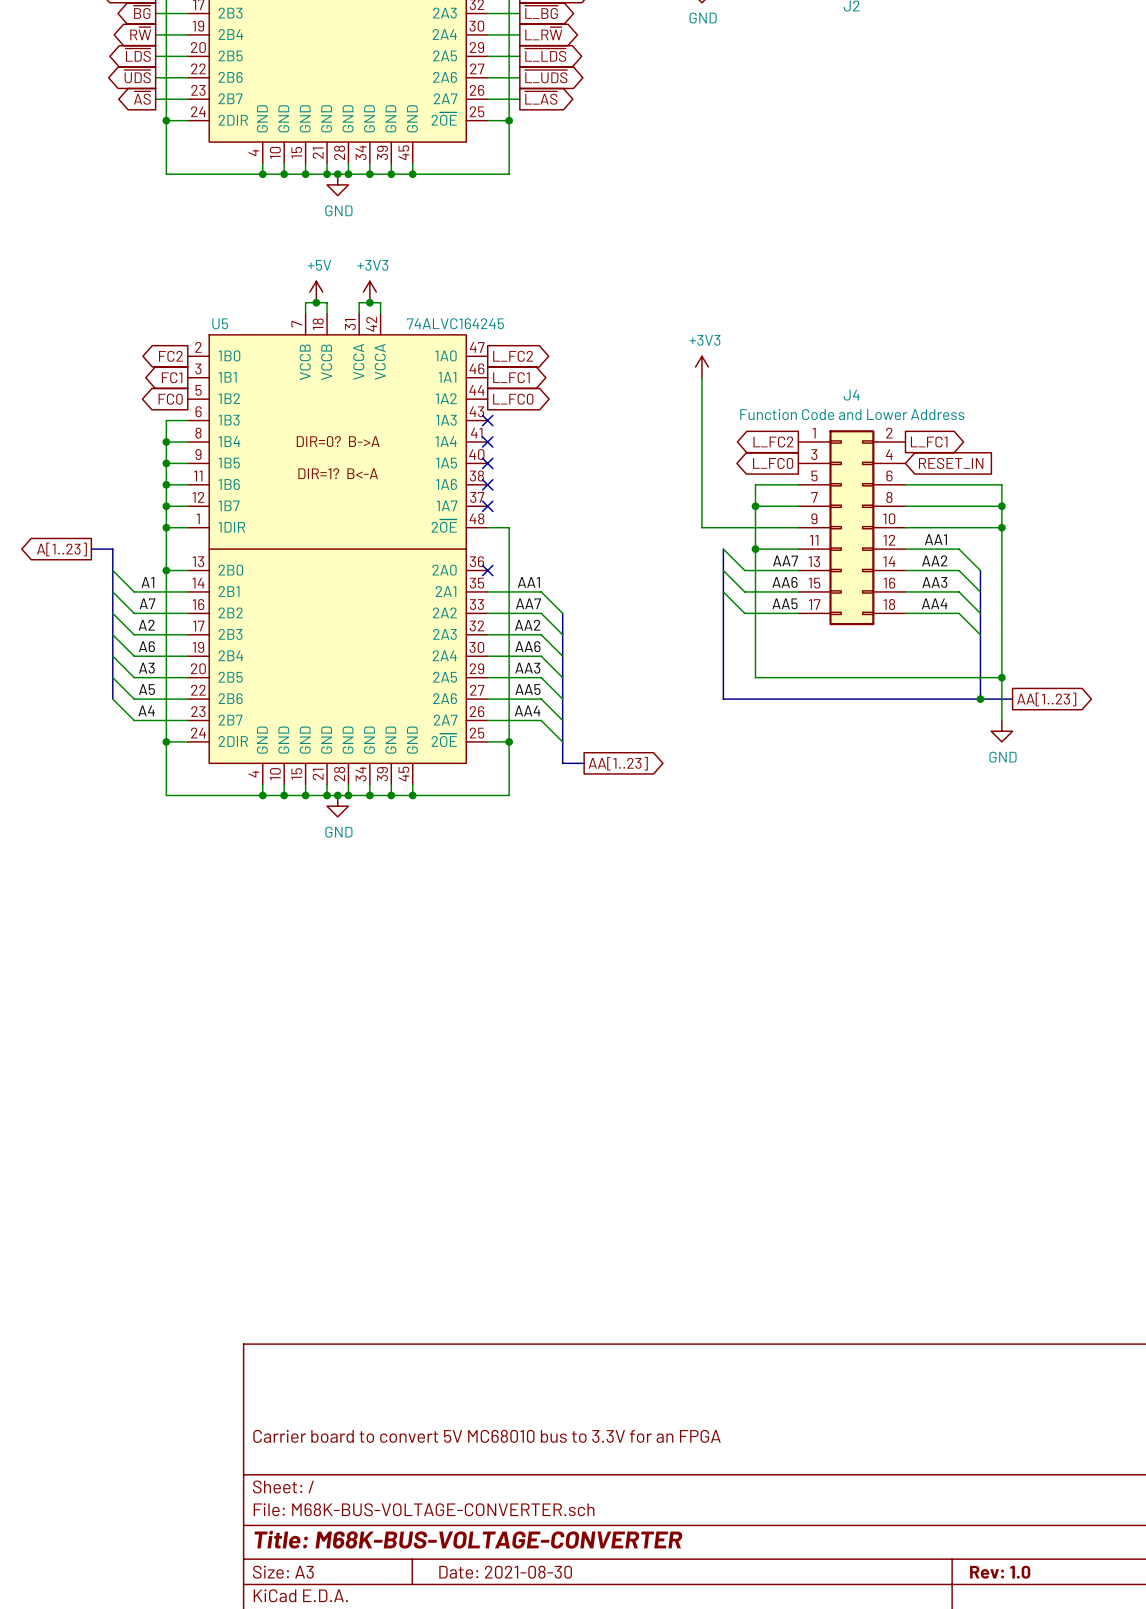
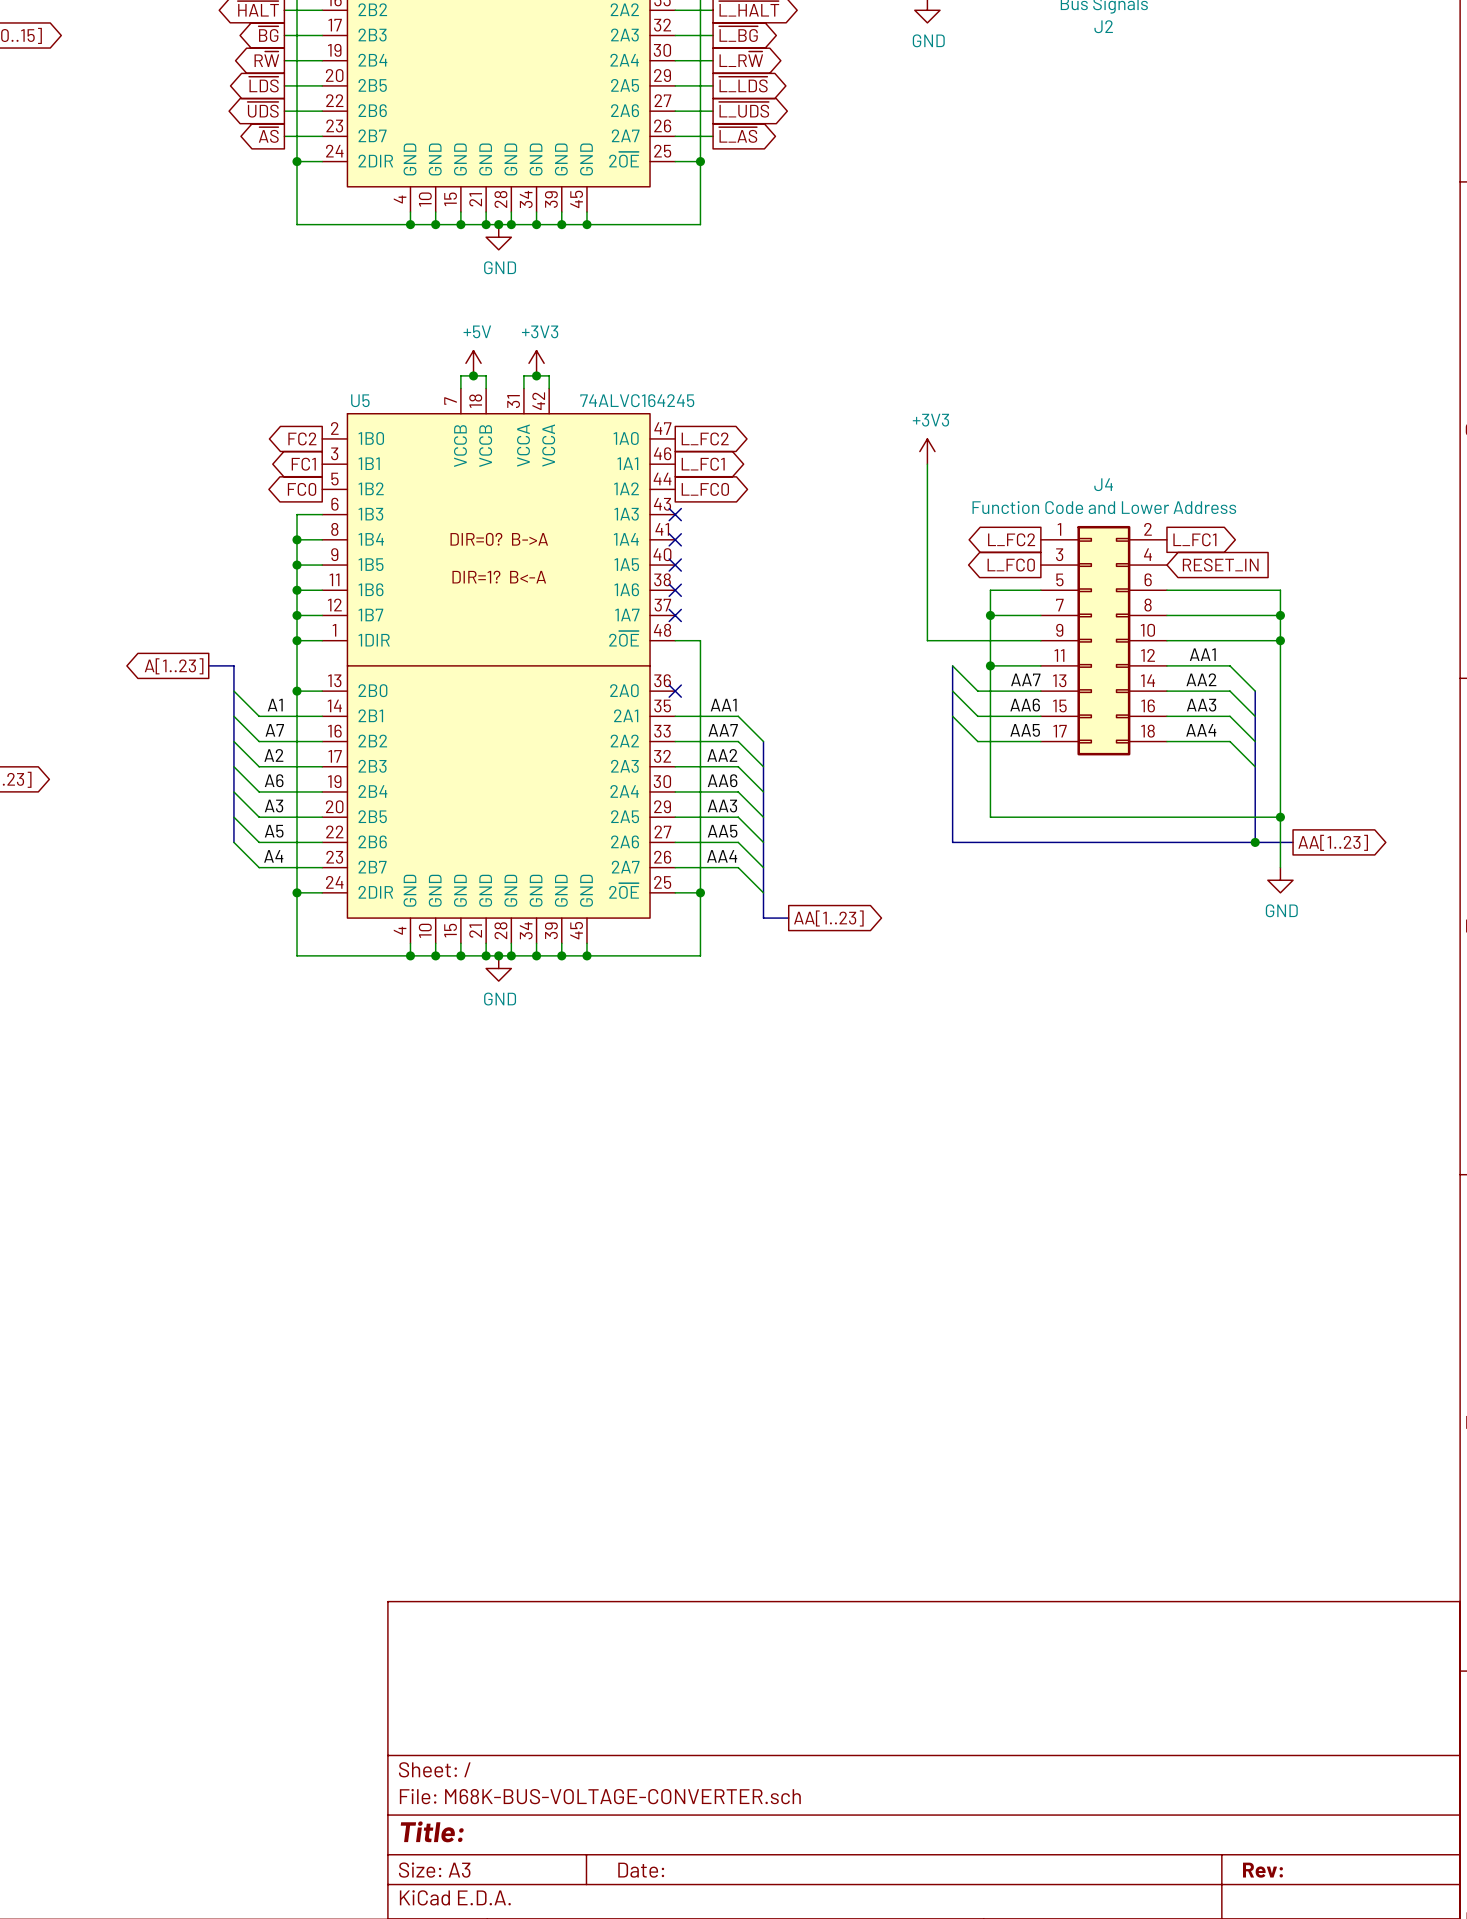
title block: Carrier board to convert 5V MC68010 bus to 3.3V for an FPGA (487, 1436) -> none
title block: Title: M68K-BUS-VOLTAGE-CONVERTER (468, 1539) -> Title: (432, 1831)
title block: Date: 2021-08-30 (505, 1572) -> Date: (641, 1870)
title block: Rev: 1.0 (1000, 1572) -> Rev: (1262, 1870)

